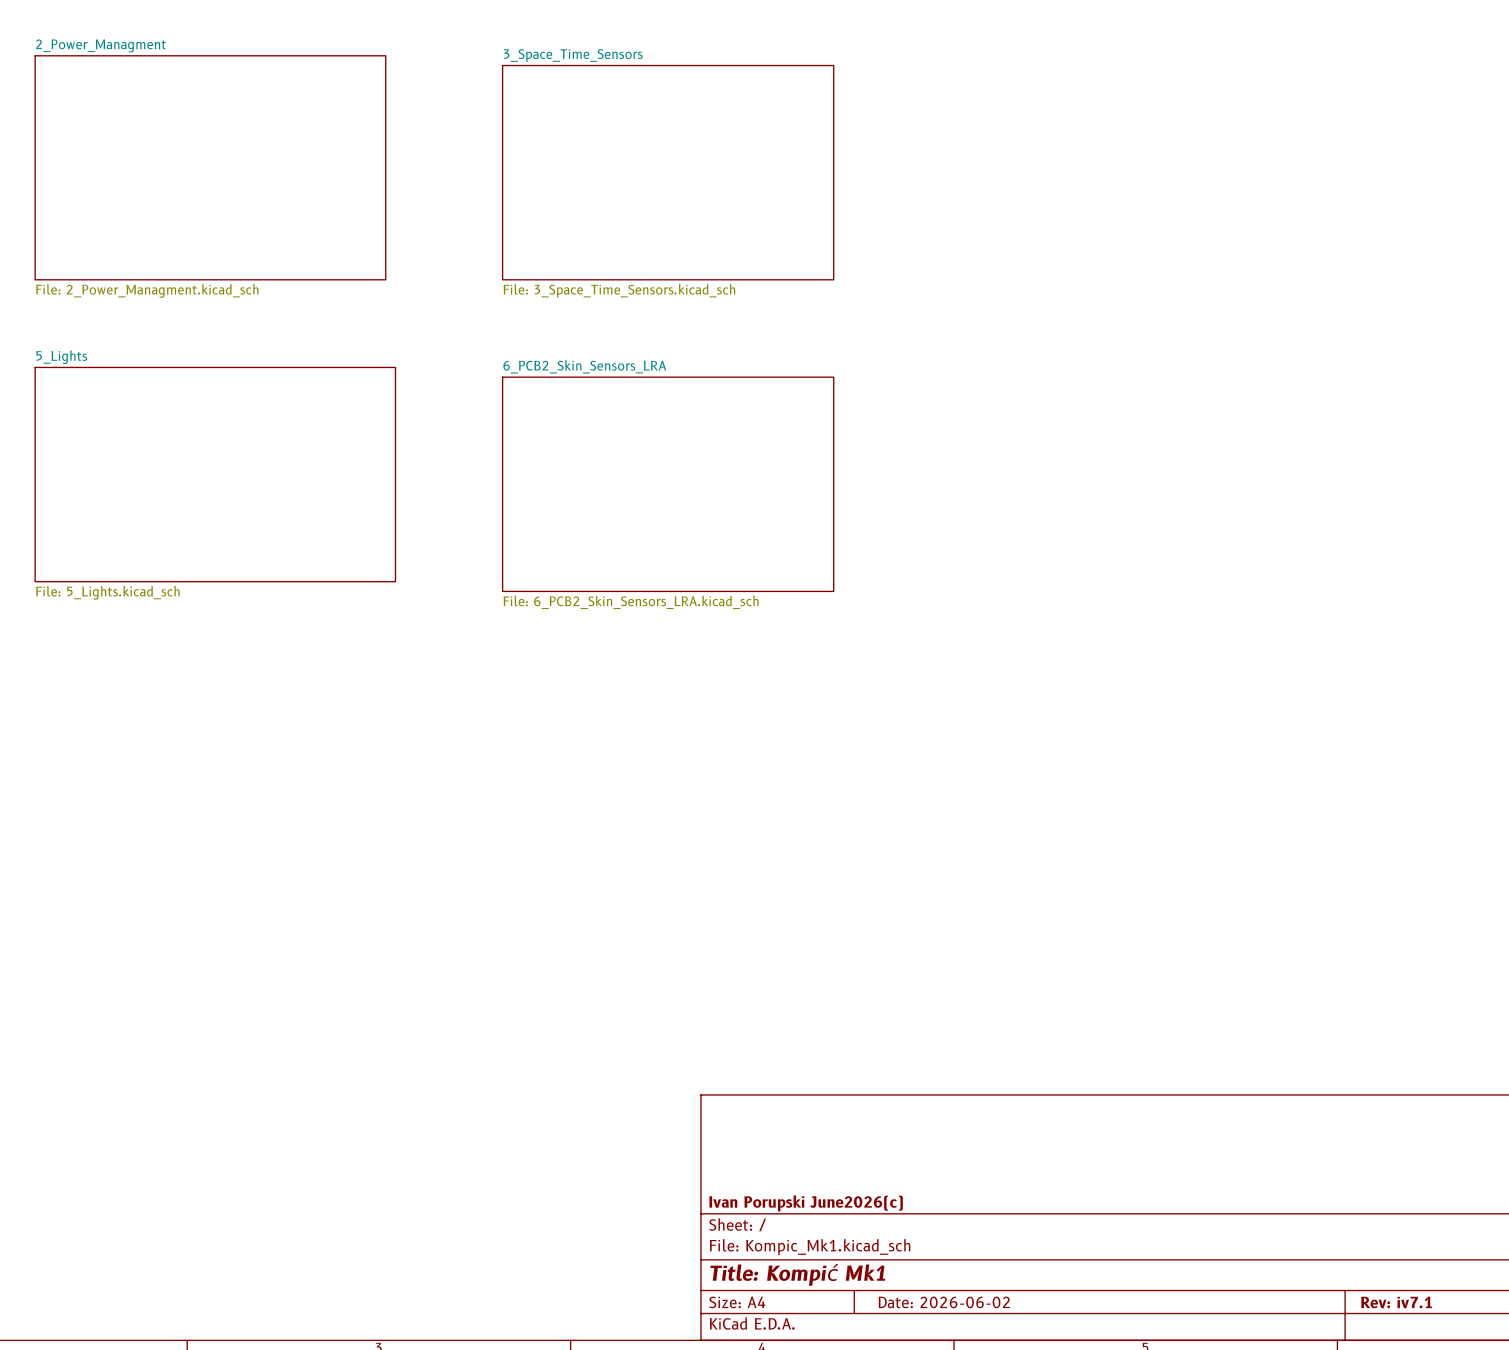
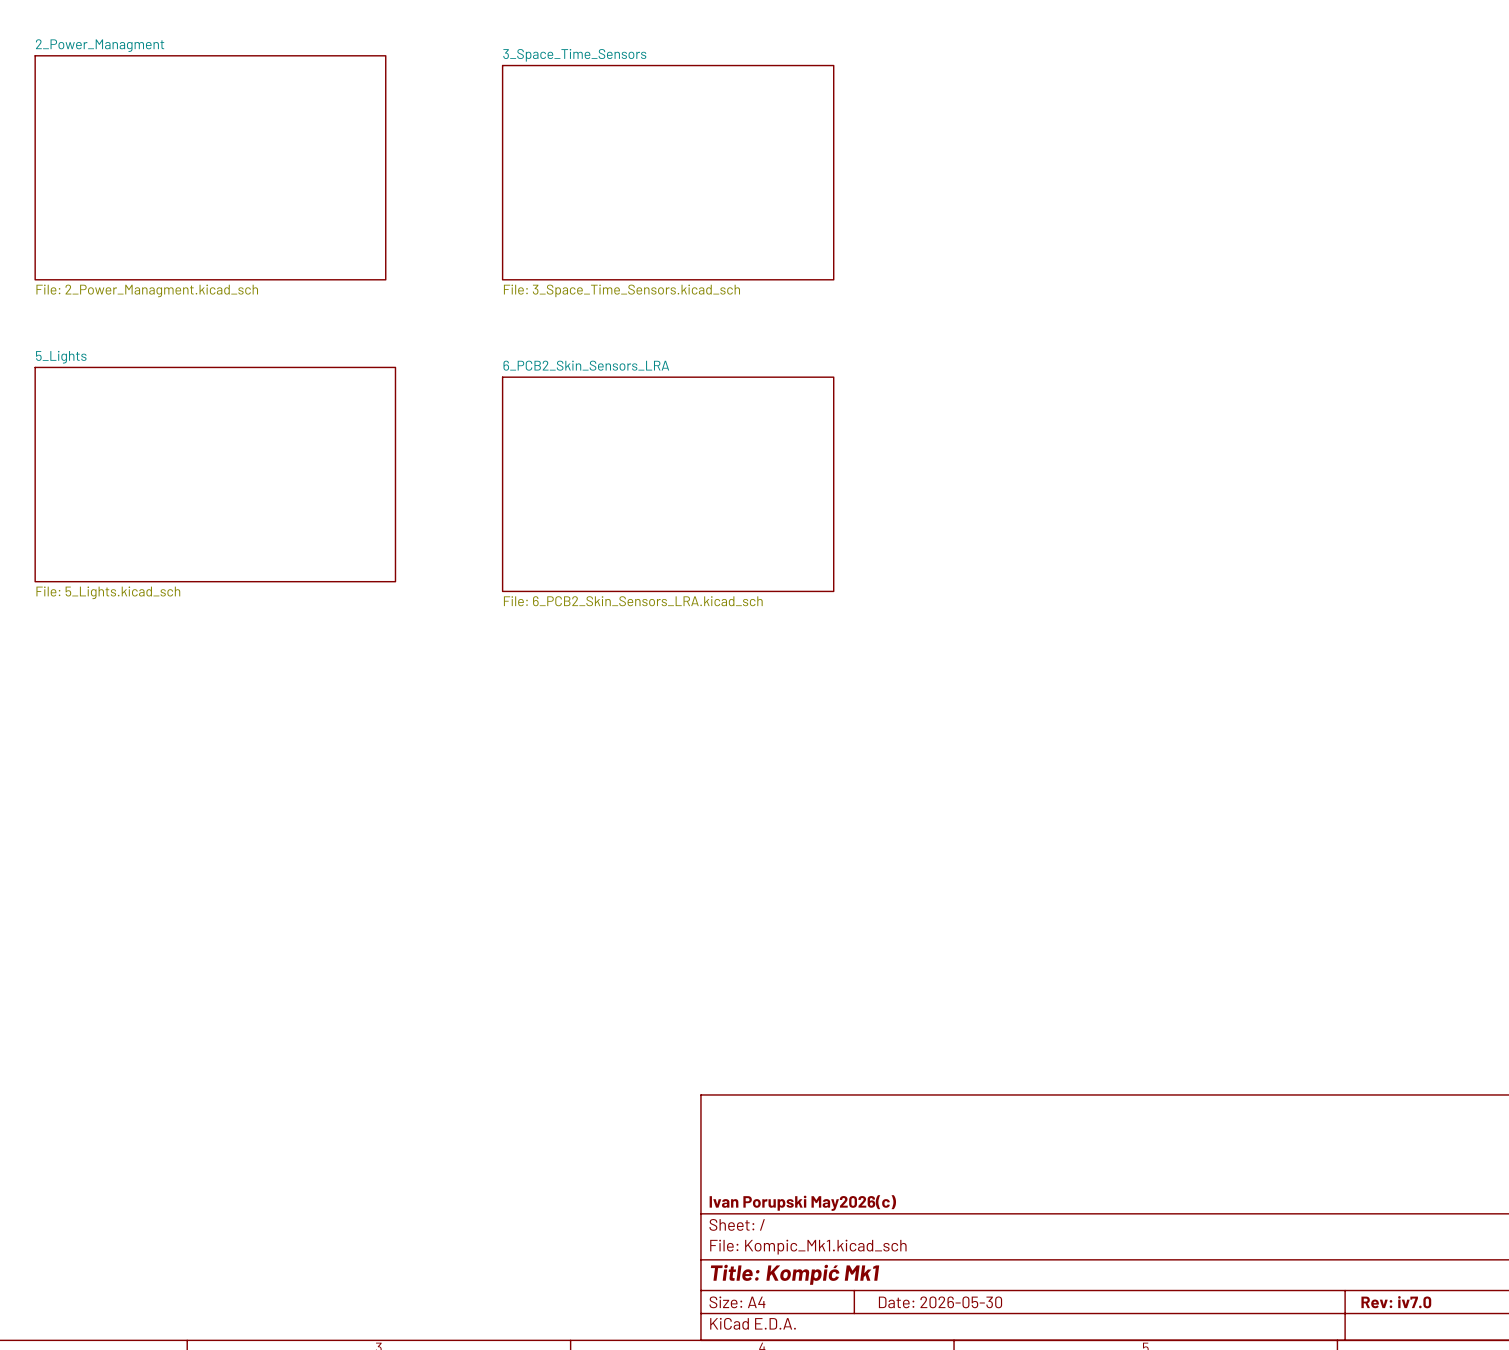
title block: Ivan Porupski June2026(c) (806, 1203) -> Ivan Porupski May2026(c) (802, 1203)
title block: Date: 2026-06-02 (944, 1302) -> Date: 2026-05-30 (940, 1302)
title block: Rev: iv7.1 (1396, 1302) -> Rev: iv7.0 (1396, 1302)

